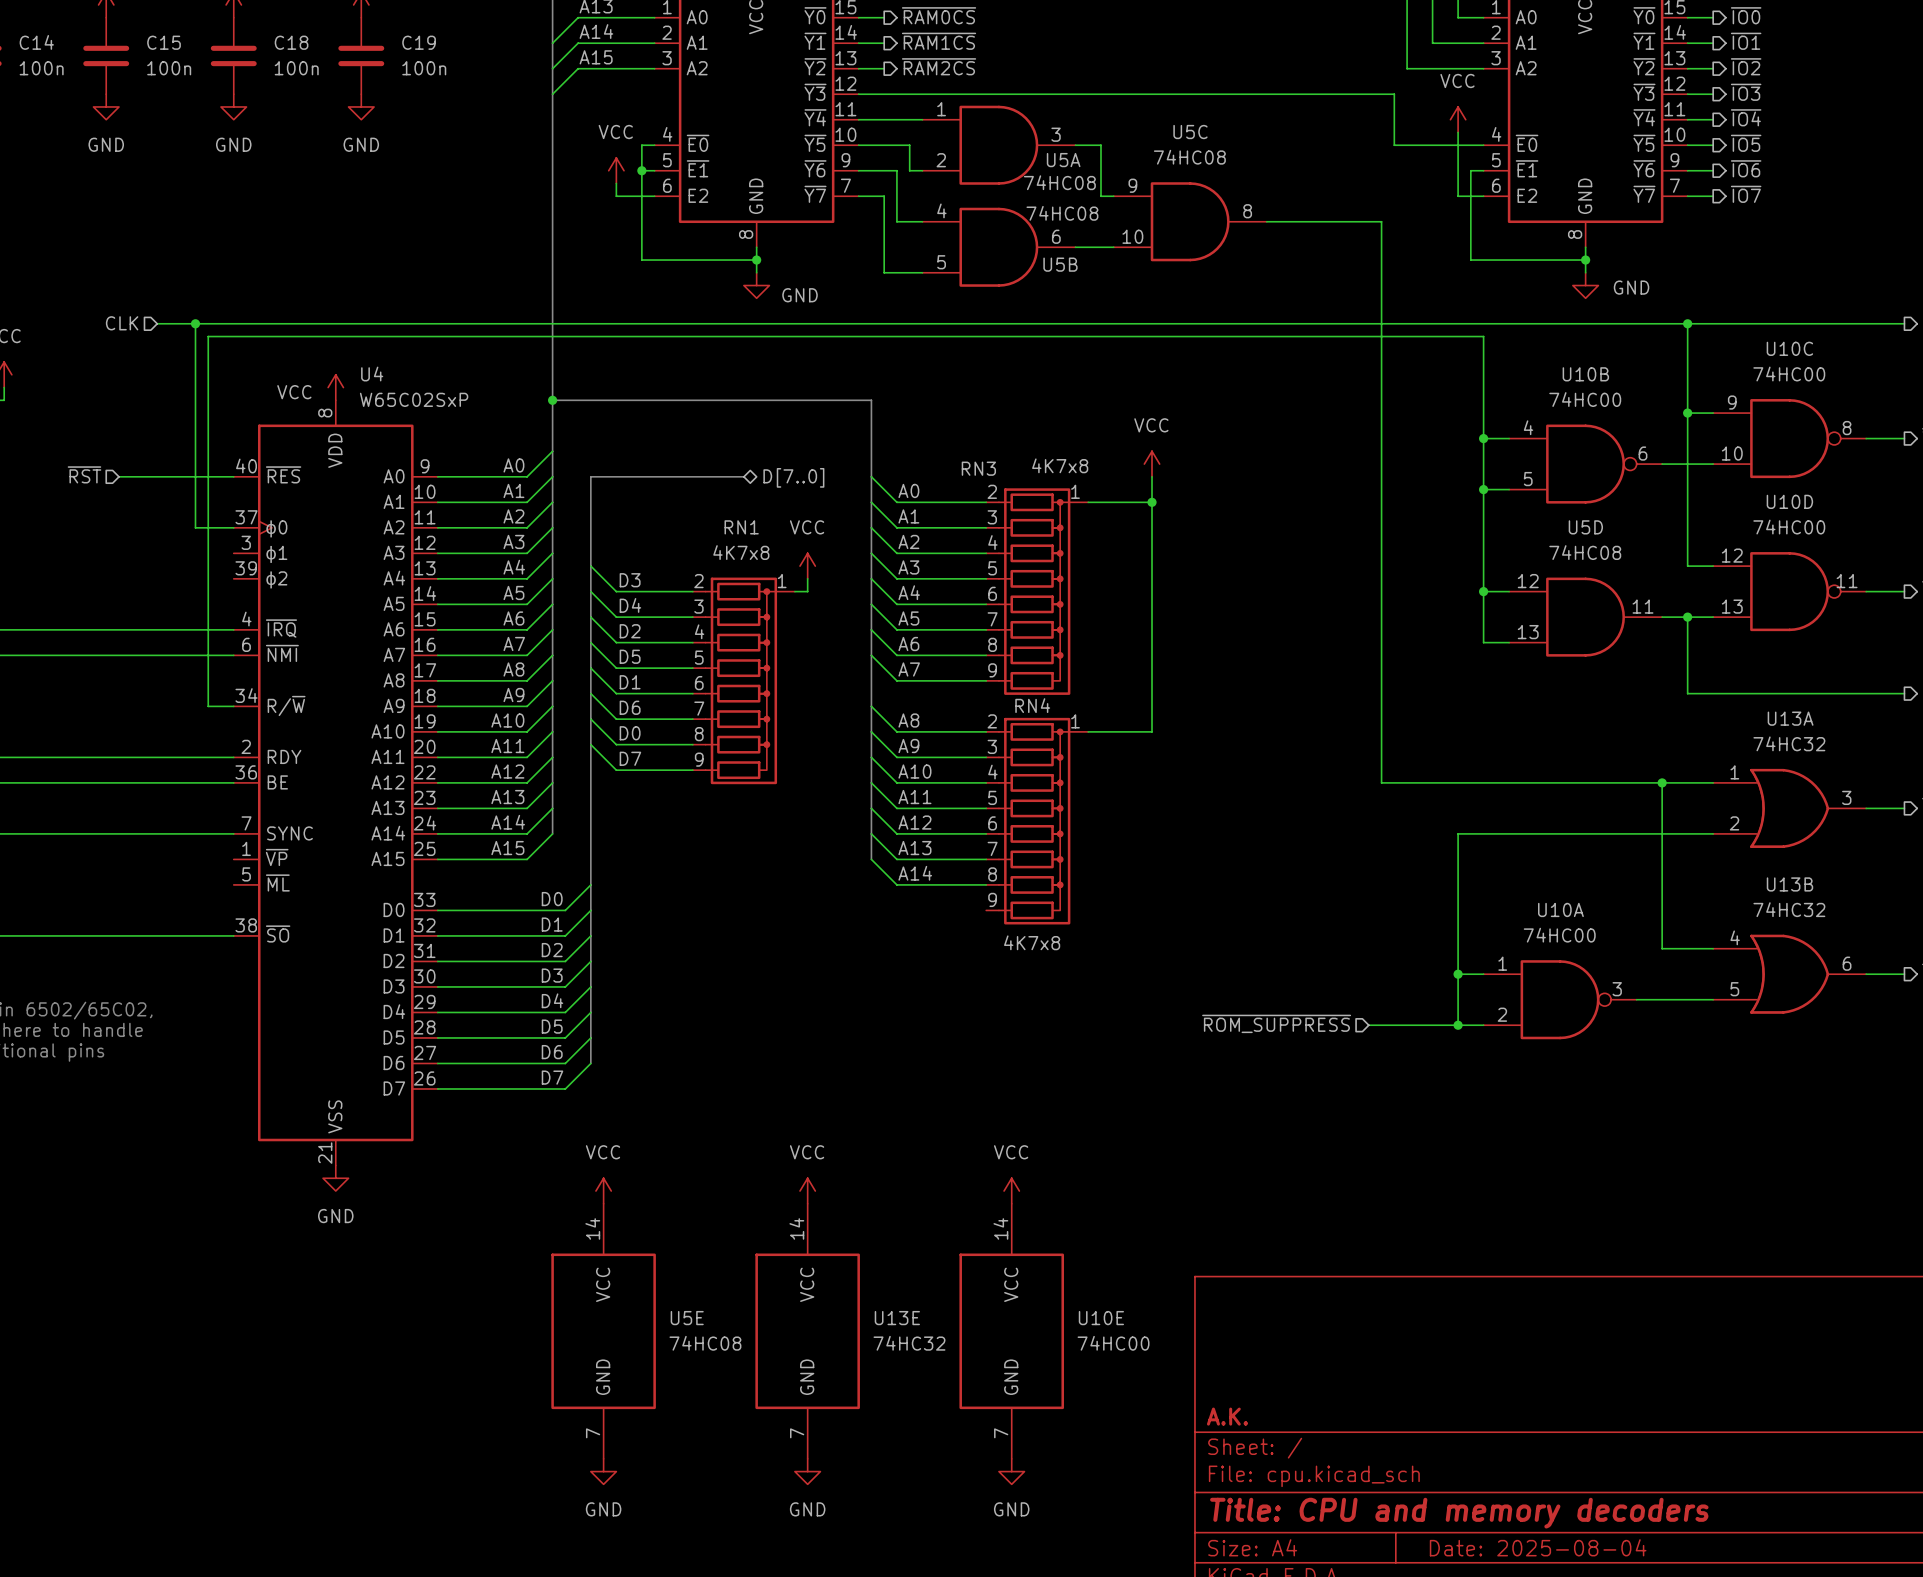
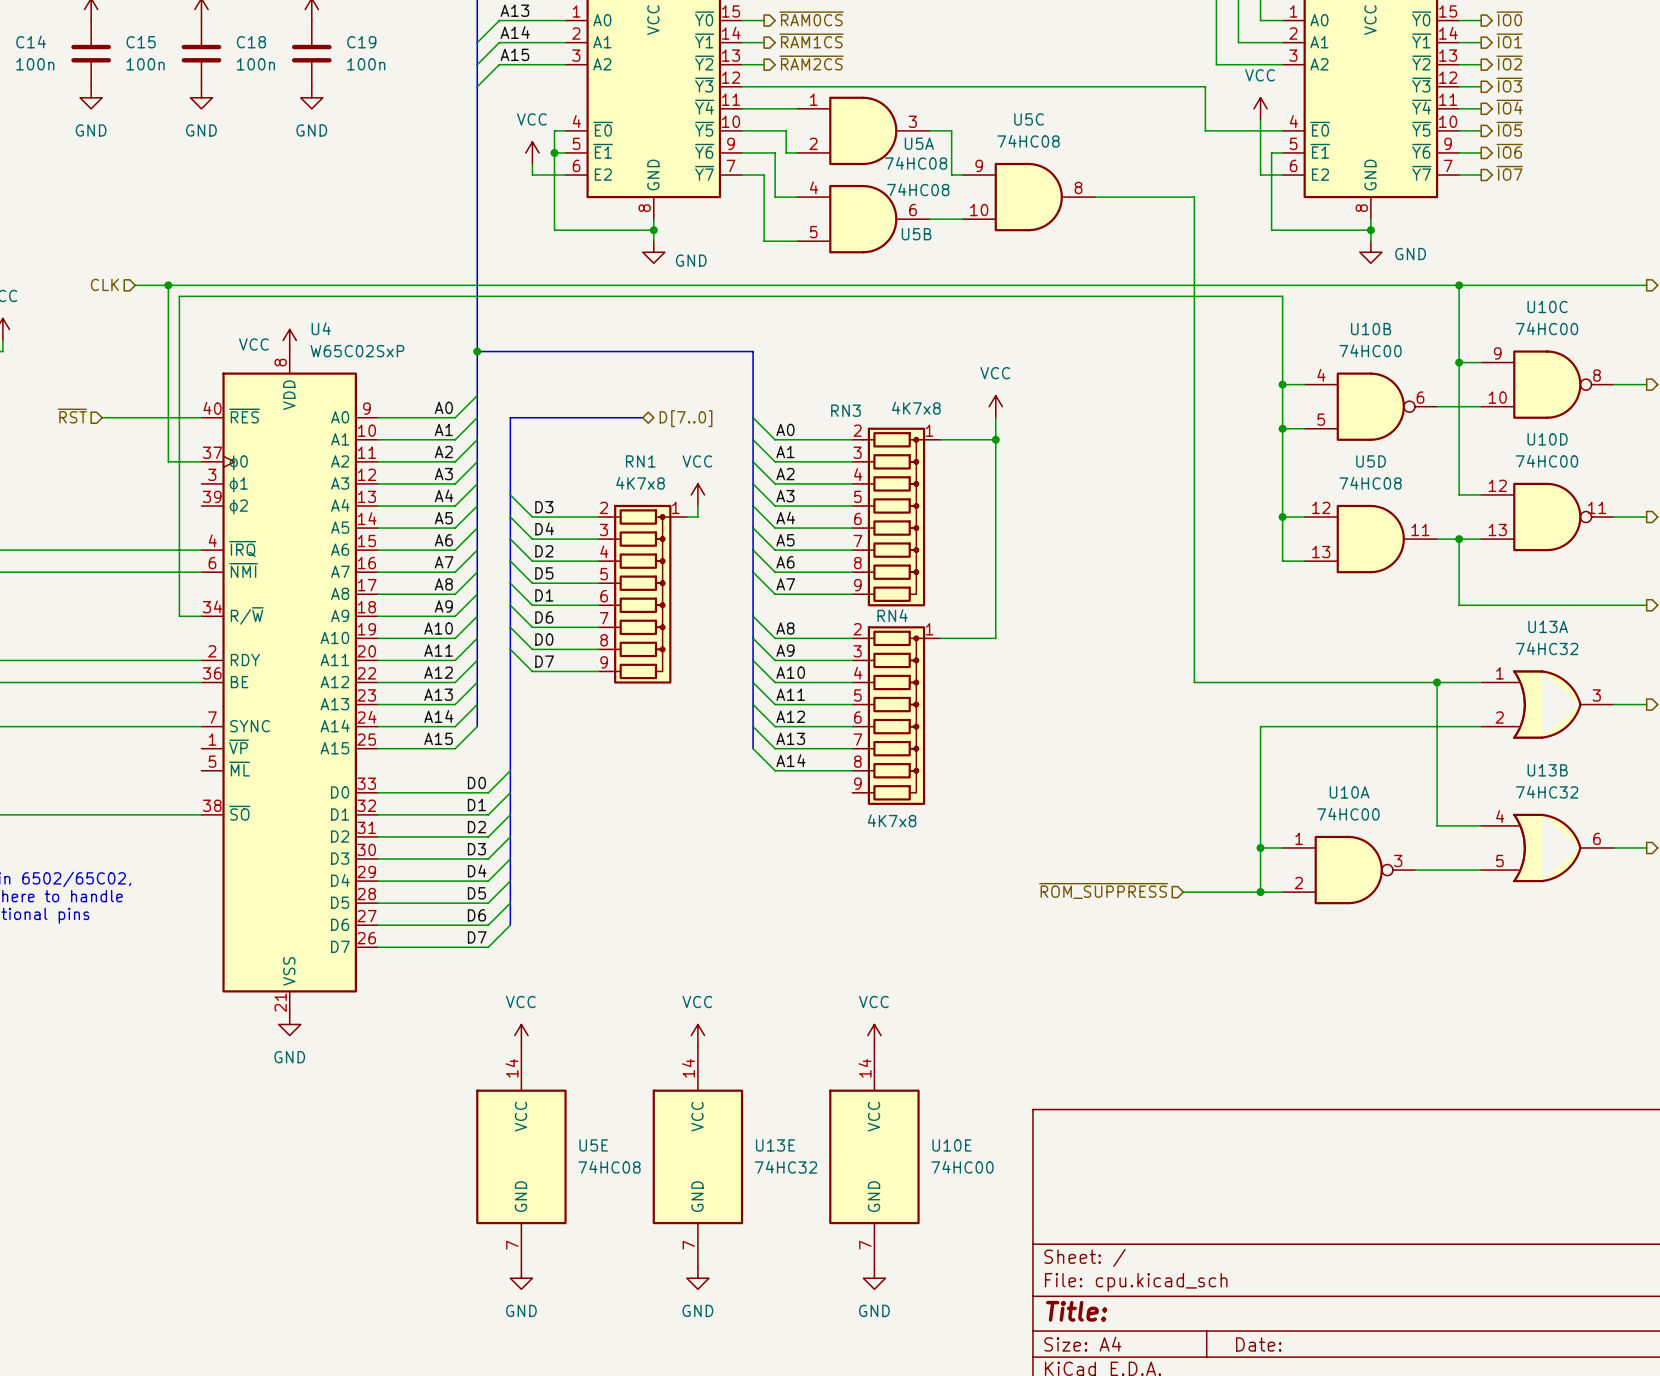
title block: A.K. (1227, 1416) -> none
title block: Title: CPU and memory decoders (1459, 1513) -> Title: (1076, 1311)
title block: Date: 2025-08-04 (1538, 1547) -> Date: (1258, 1344)

